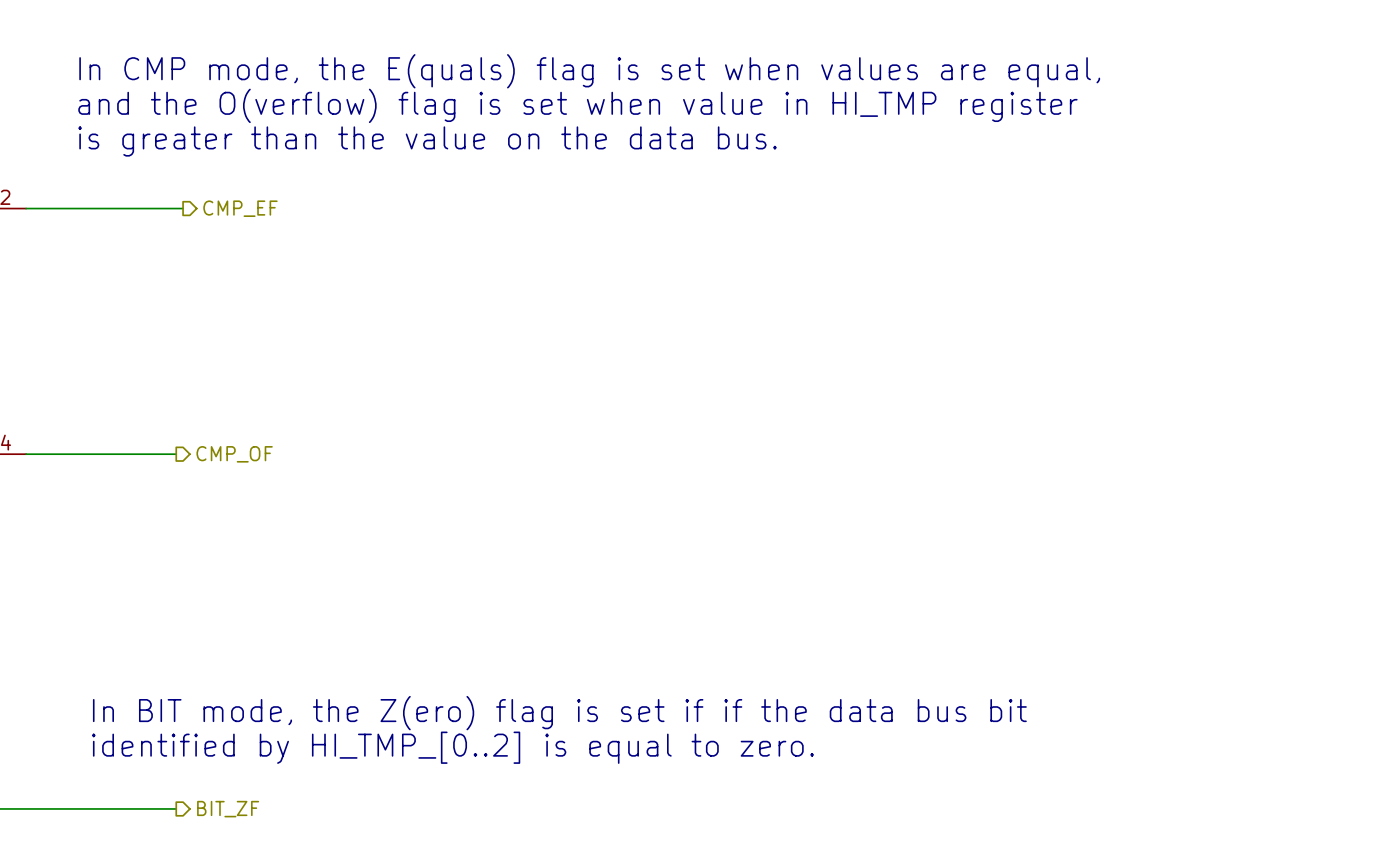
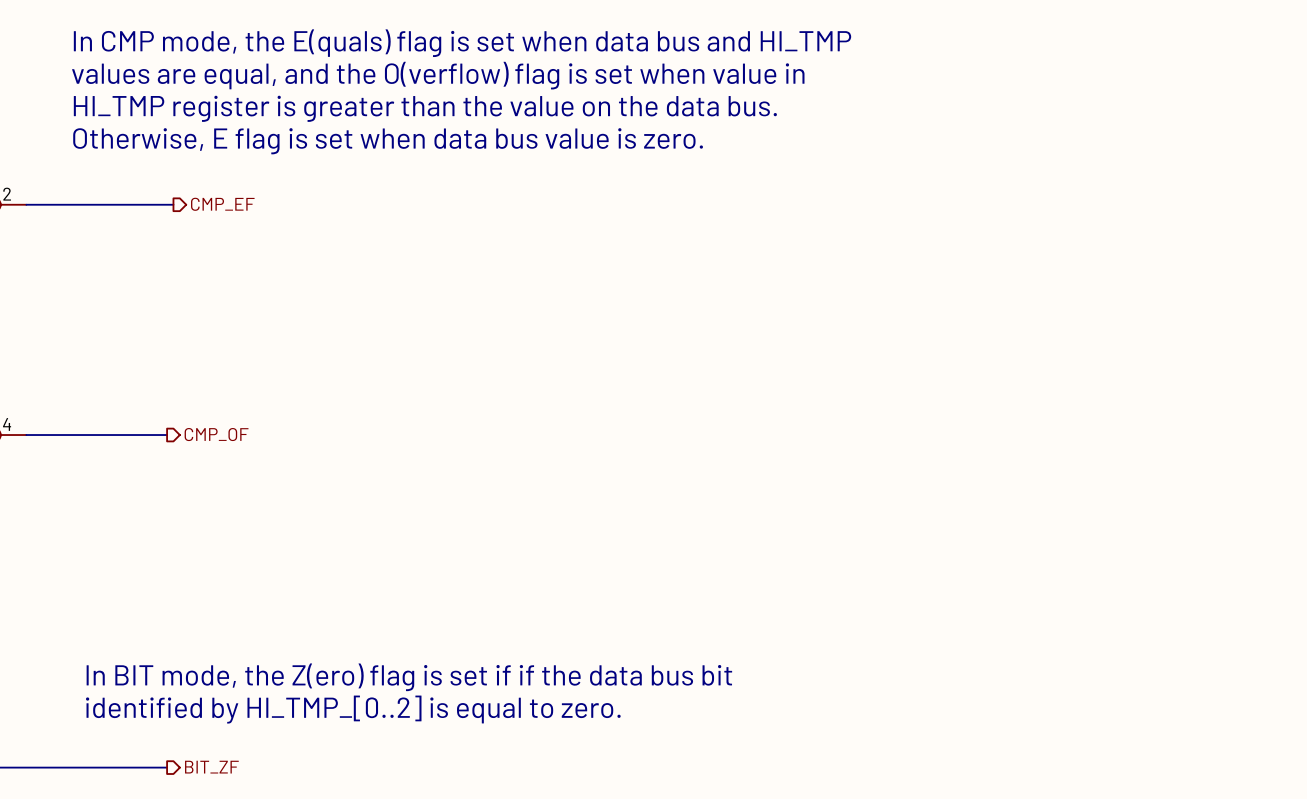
text: none -> In CMP mode, the E(quals) flag is set when data bus and HI_TMP (462, 43)
text: In CMP mode, the E(quals) flag is set when values are equal, (589, 71) -> values are equal, and the O(verflow) flag is set when value in (438, 75)
text: and the O(verflow) flag is set when value in HI_TMP register (577, 105) -> HI_TMP register is greater than the value on the data bus. (425, 108)
text: is greater than the value on the data bus. (427, 141) -> Otherwise, E flag is set when data bus value is zero. (388, 141)

